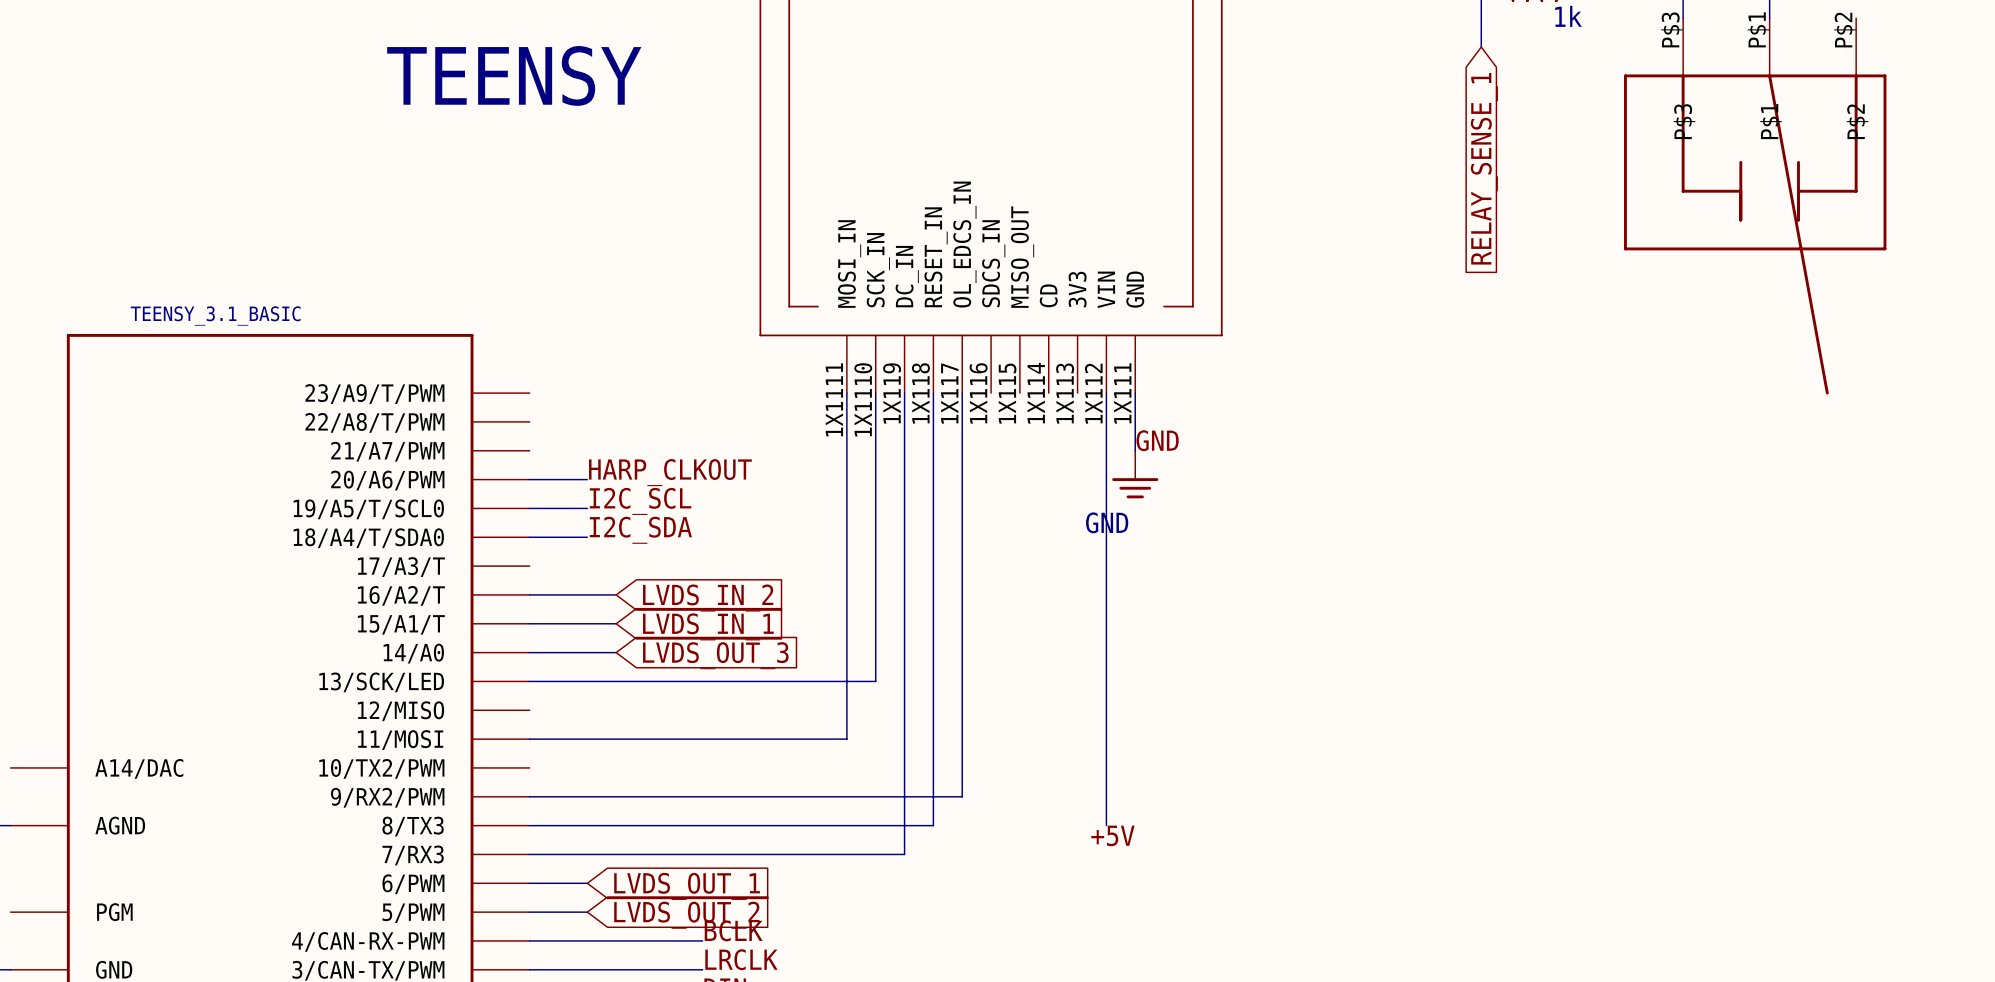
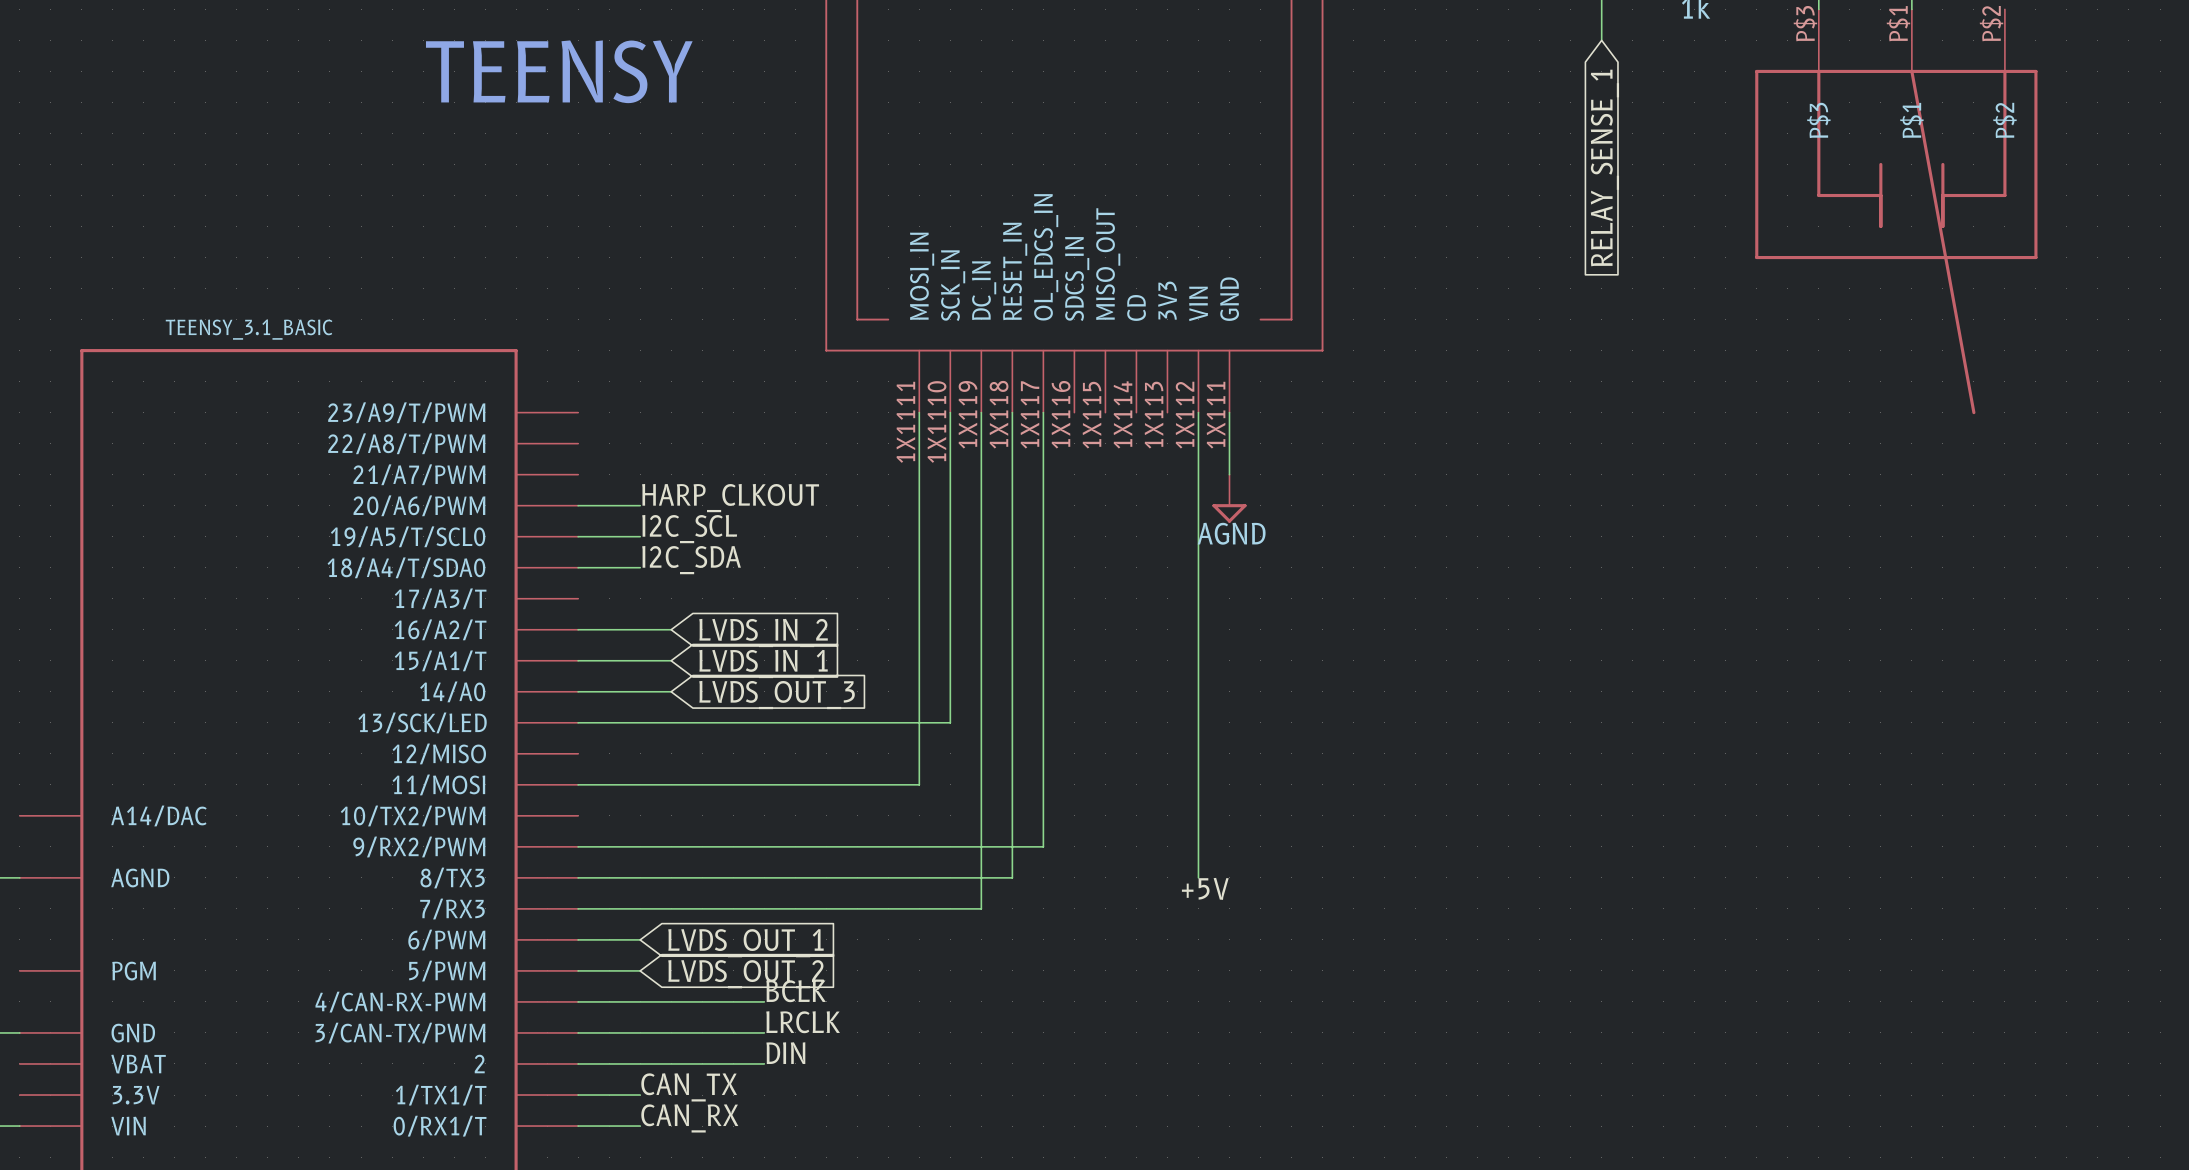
label: GND (1157, 440) -> none
power symbol: GND (1135, 474) -> AGND (1229, 498)

